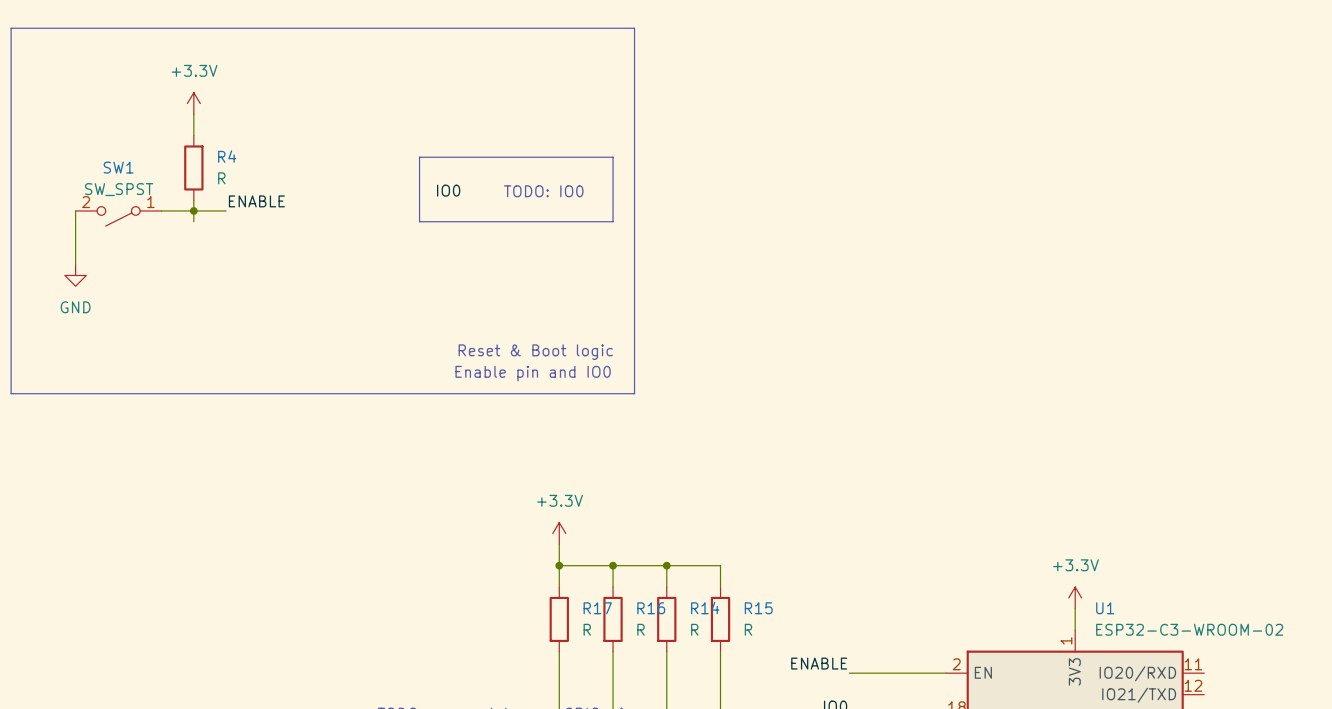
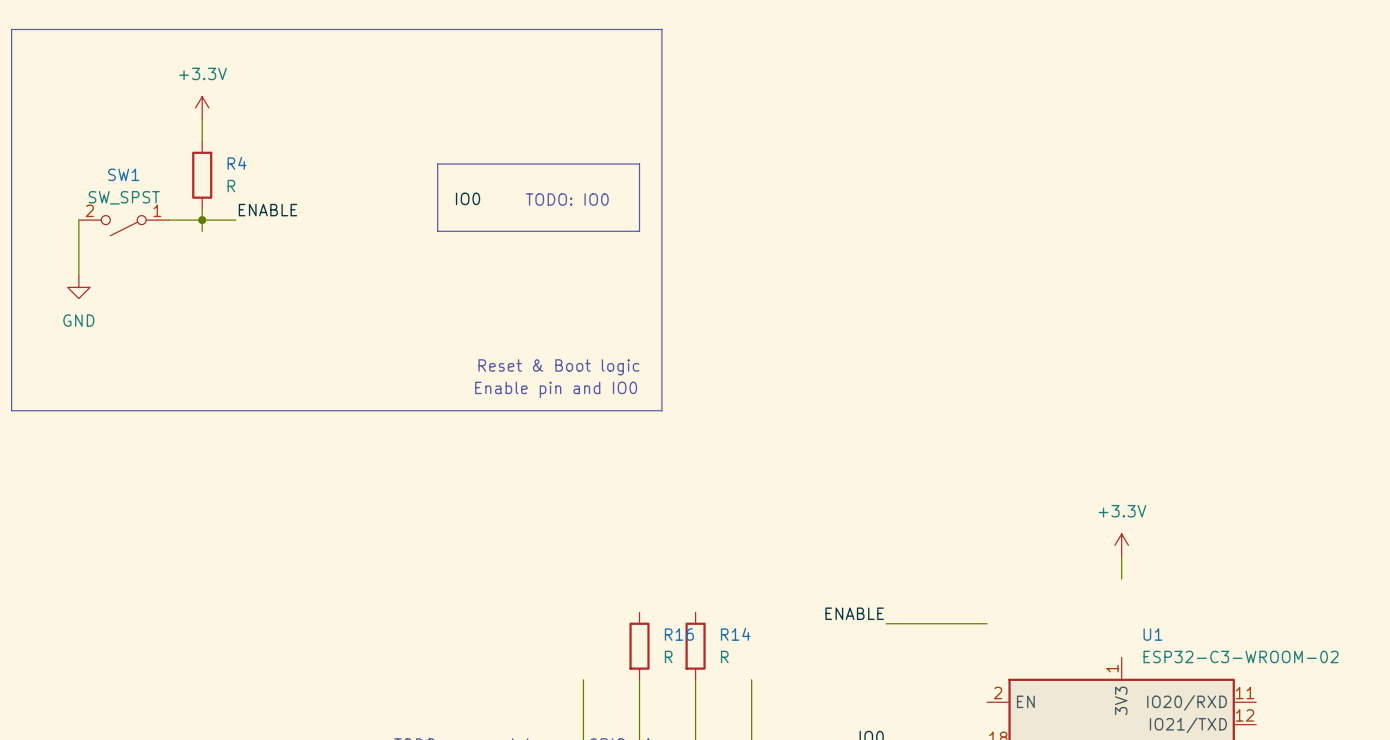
power symbol: +3.3V (559, 533) -> none
wire: (559, 544) (559, 587) -> none
wire: (559, 565) (720, 565) (720, 587) -> none
junction: (559, 565) -> none
wire: (613, 565) (613, 587) -> none
junction: (613, 565) -> none
wire: (666, 565) (666, 587) -> none
junction: (666, 565) -> none
power symbol position: +3.3V (1075, 597) -> +3.3V (1121, 545)
wire: (1075, 608) (1075, 630) -> (1121, 556) (1121, 578)
R17: R (559, 619) -> none
R15: R (720, 619) -> none
label position: ENABLE (819, 663) -> ENABLE (854, 613)
wire: (849, 673) (946, 673) -> (886, 623) (987, 623)

